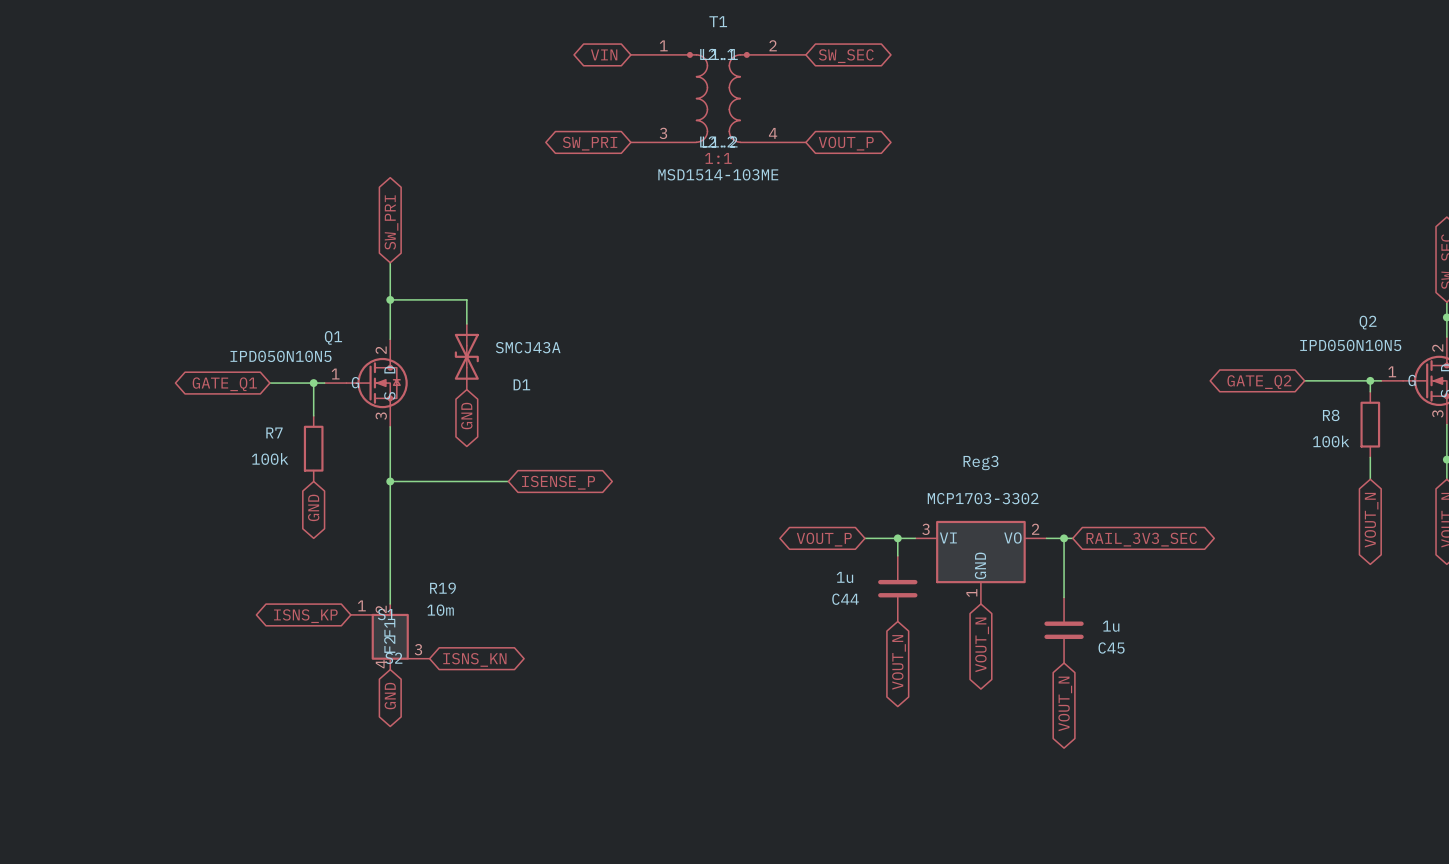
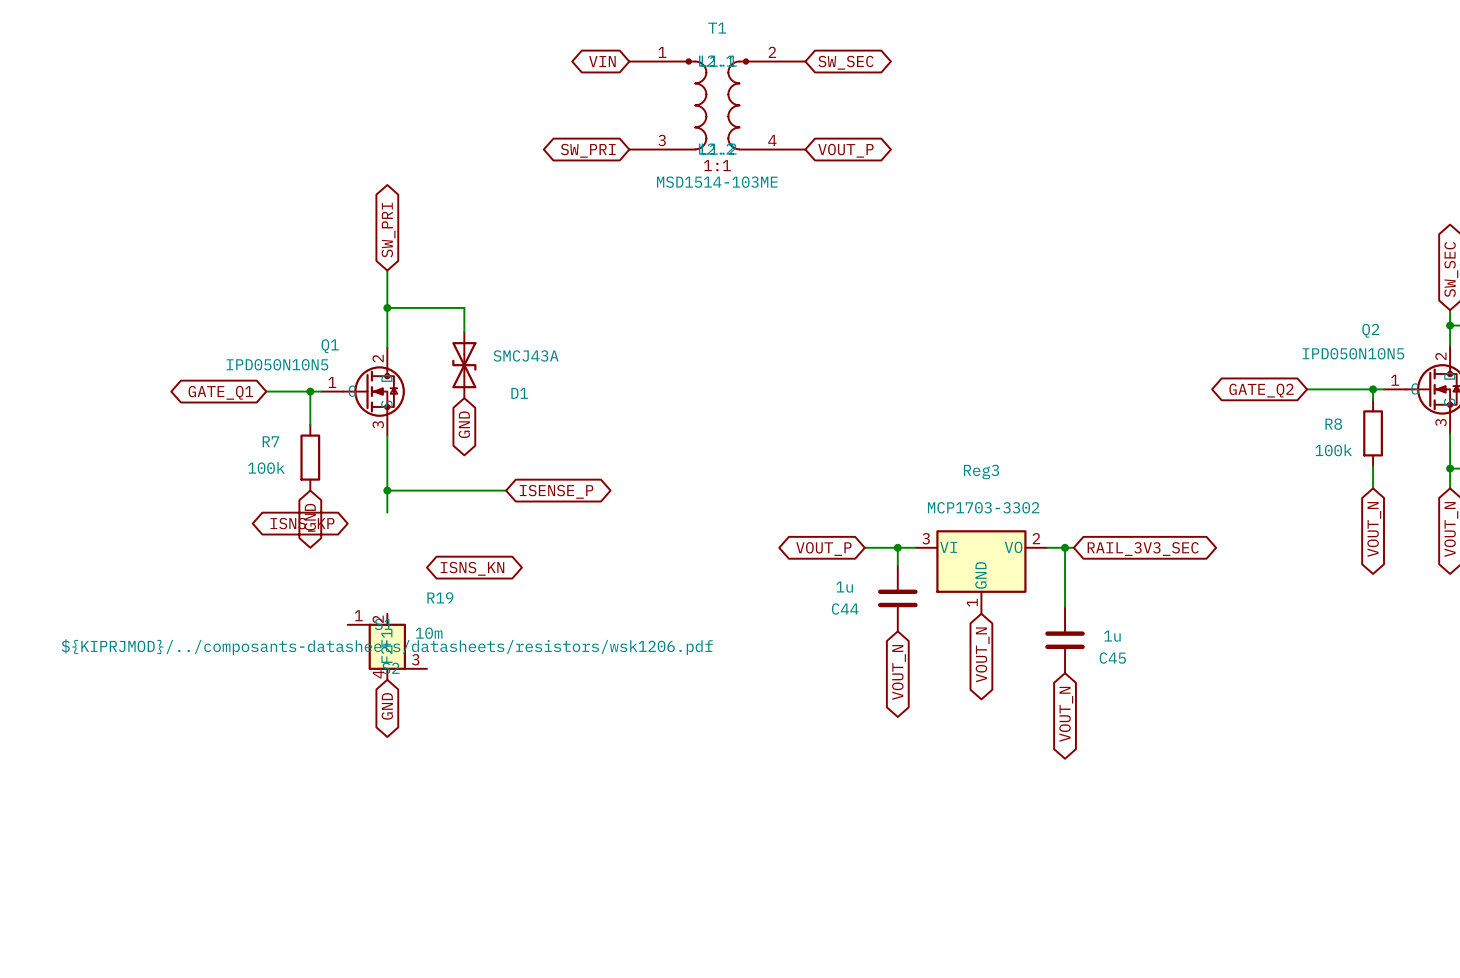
wire: (390, 503) (390, 604) -> none
R19 value position: 10m (440, 610) -> 10m (429, 633)
global label position: ISNS_KP (305, 616) -> ISNS_KP (302, 524)
R19 text: none -> ${KIPRJMOD}/../composants-datasheets/datasheets/resistors/wsk1206.pdf (387, 647)
global label position: ISNS_KN (474, 659) -> ISNS_KN (472, 568)

